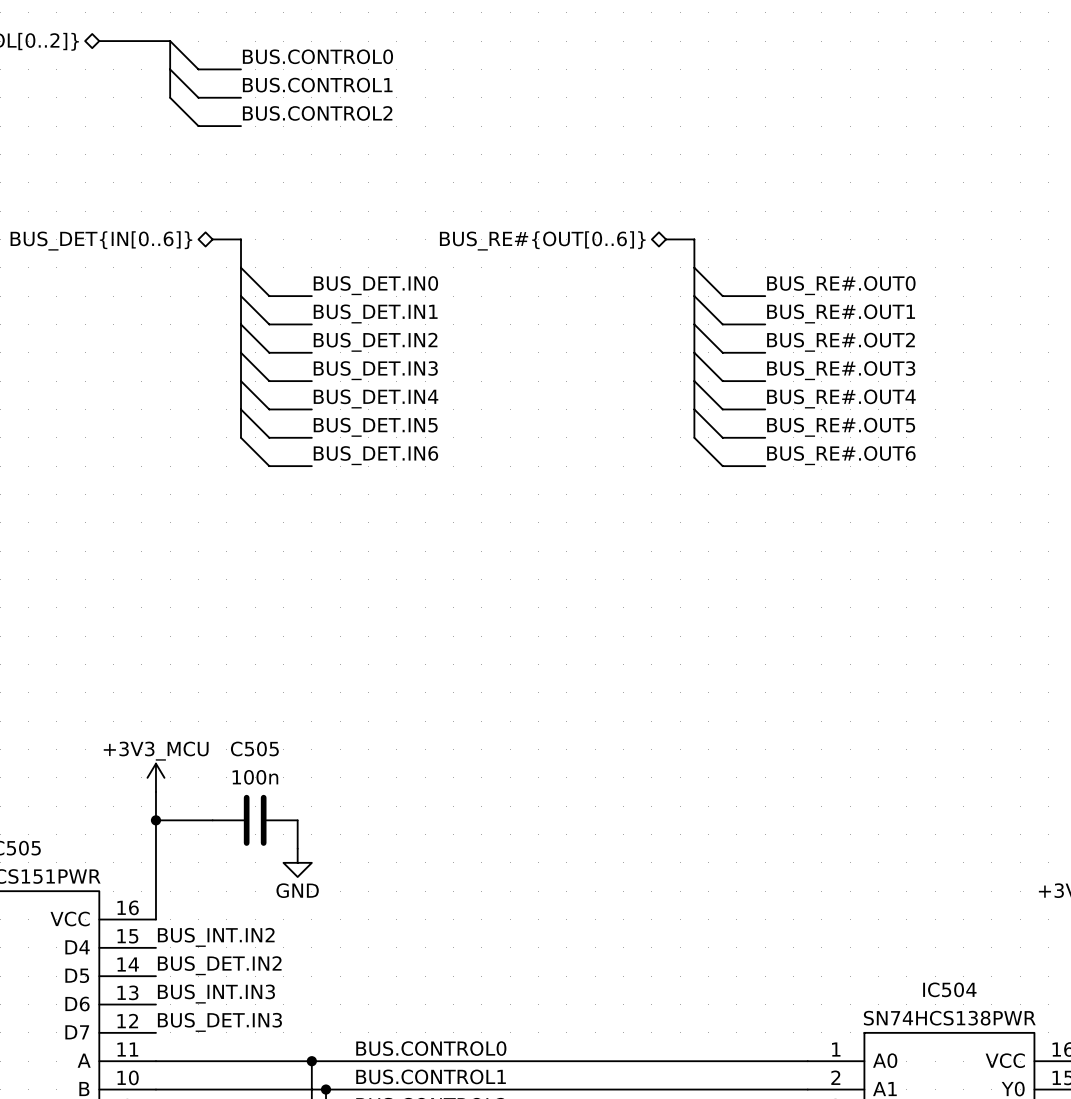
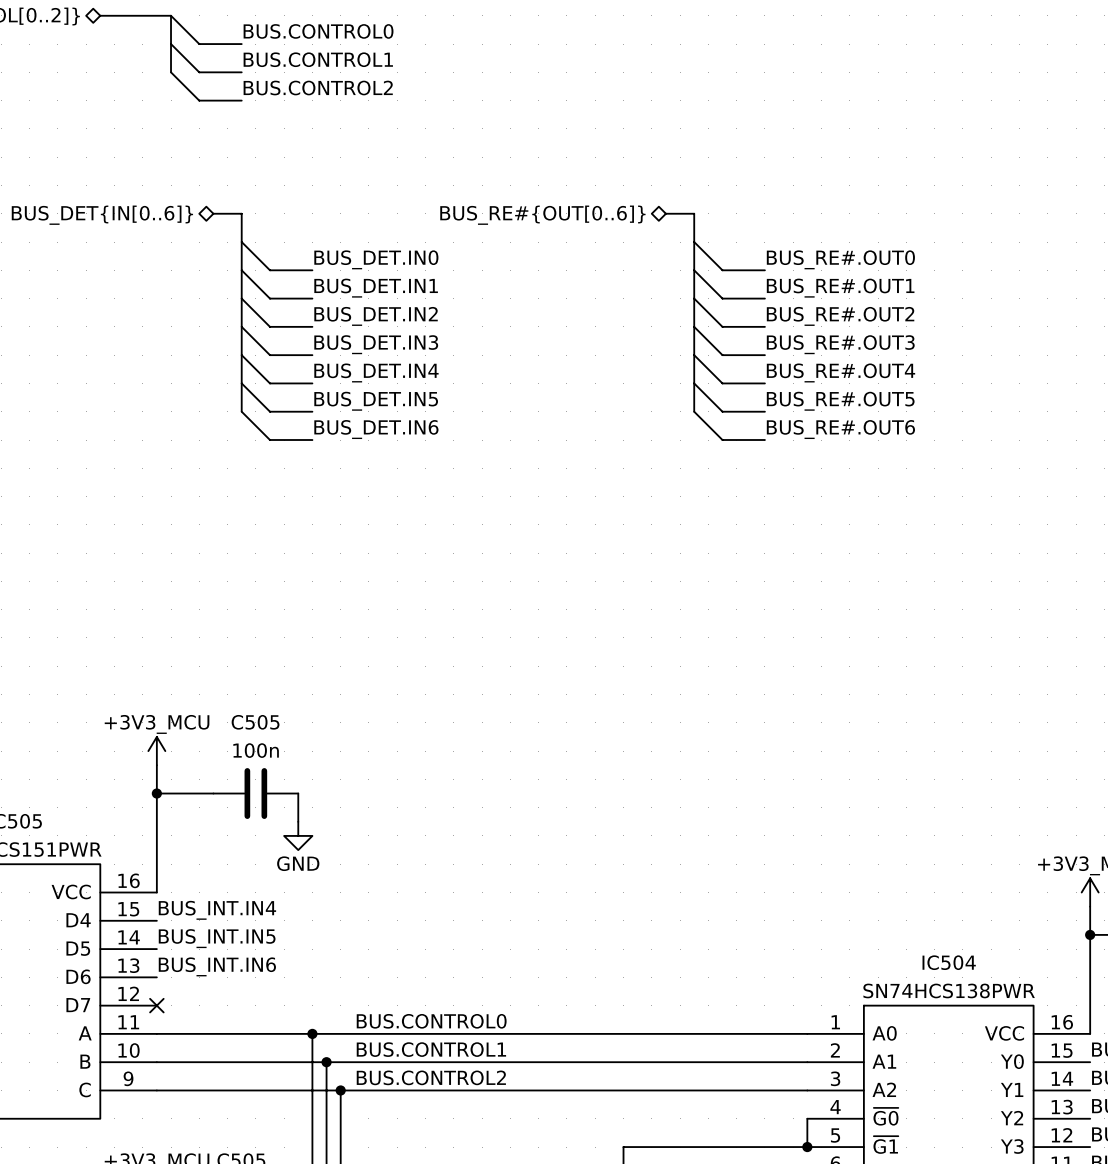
label: BUS_INT.IN2 (216, 937) -> BUS_INT.IN4 (217, 910)
label: BUS_DET.IN2 (219, 965) -> BUS_INT.IN5 (217, 938)
label: BUS_INT.IN3 (216, 994) -> BUS_INT.IN6 (217, 966)
label: BUS_DET.IN3 (219, 1022) -> none
no-connect mark: none -> (156, 1005)

